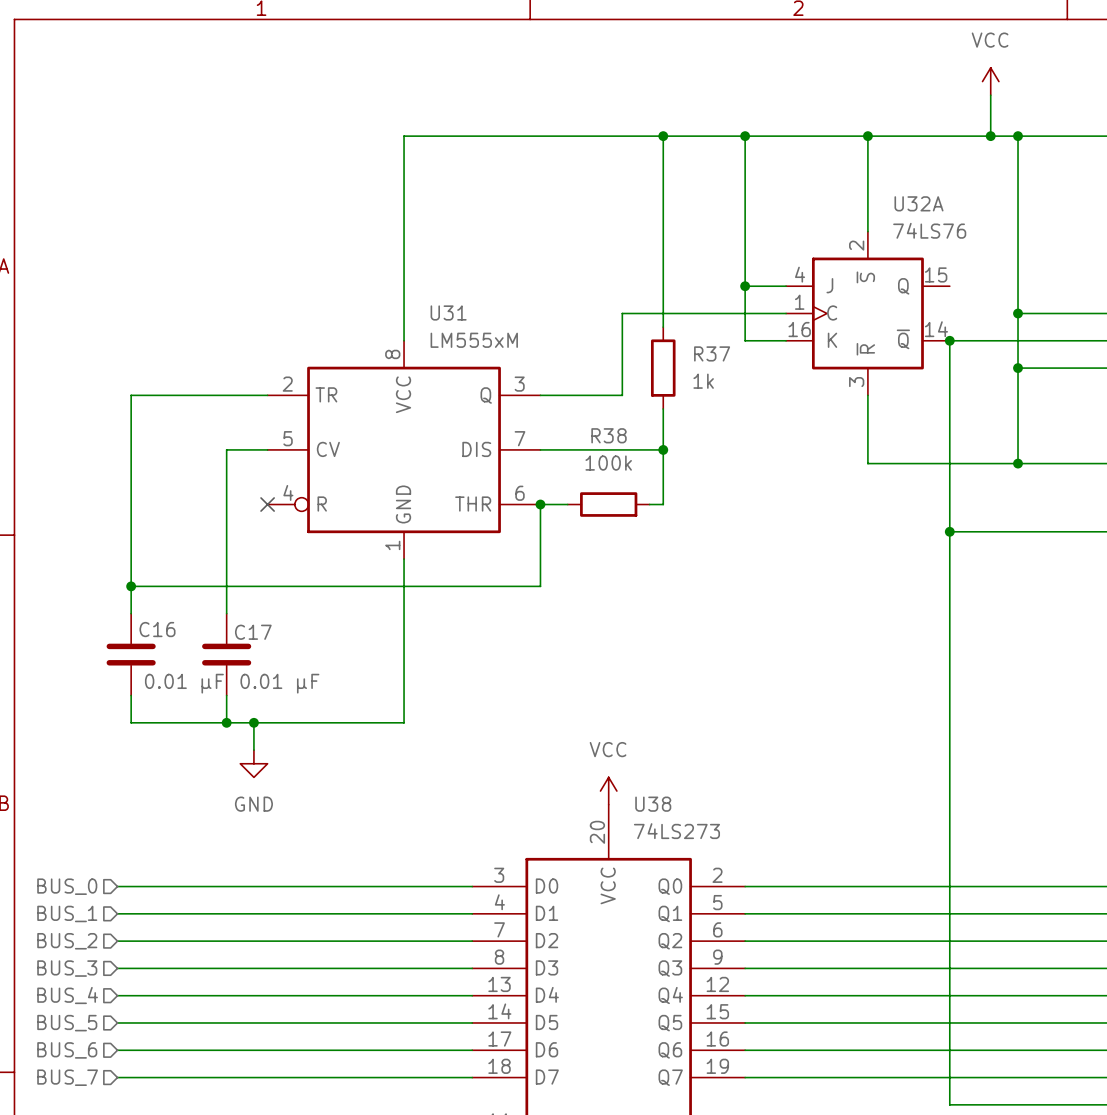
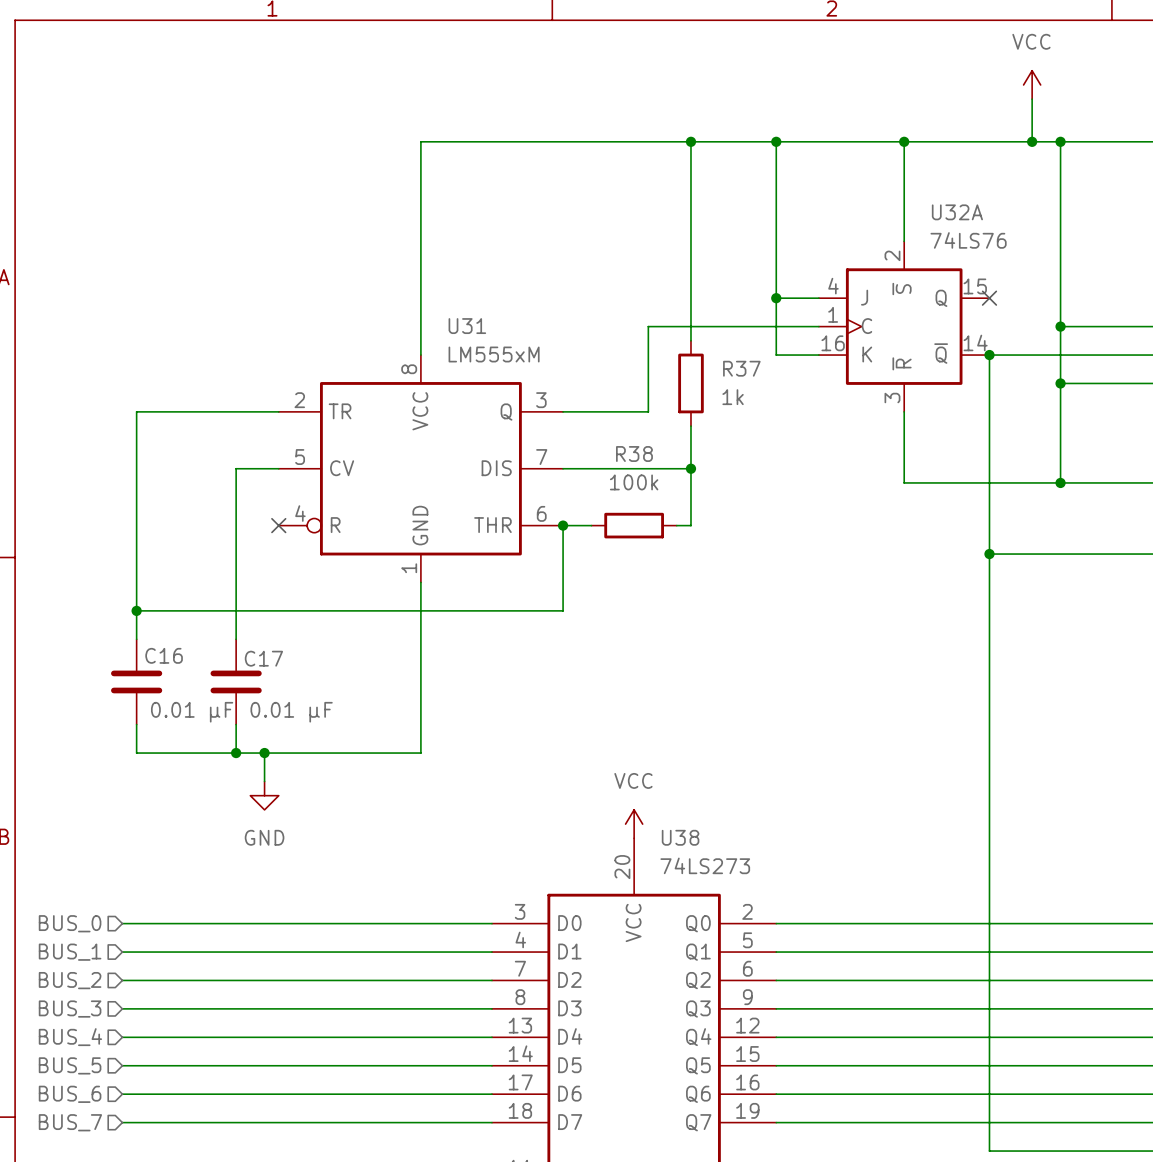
no-connect mark: none -> (989, 298)

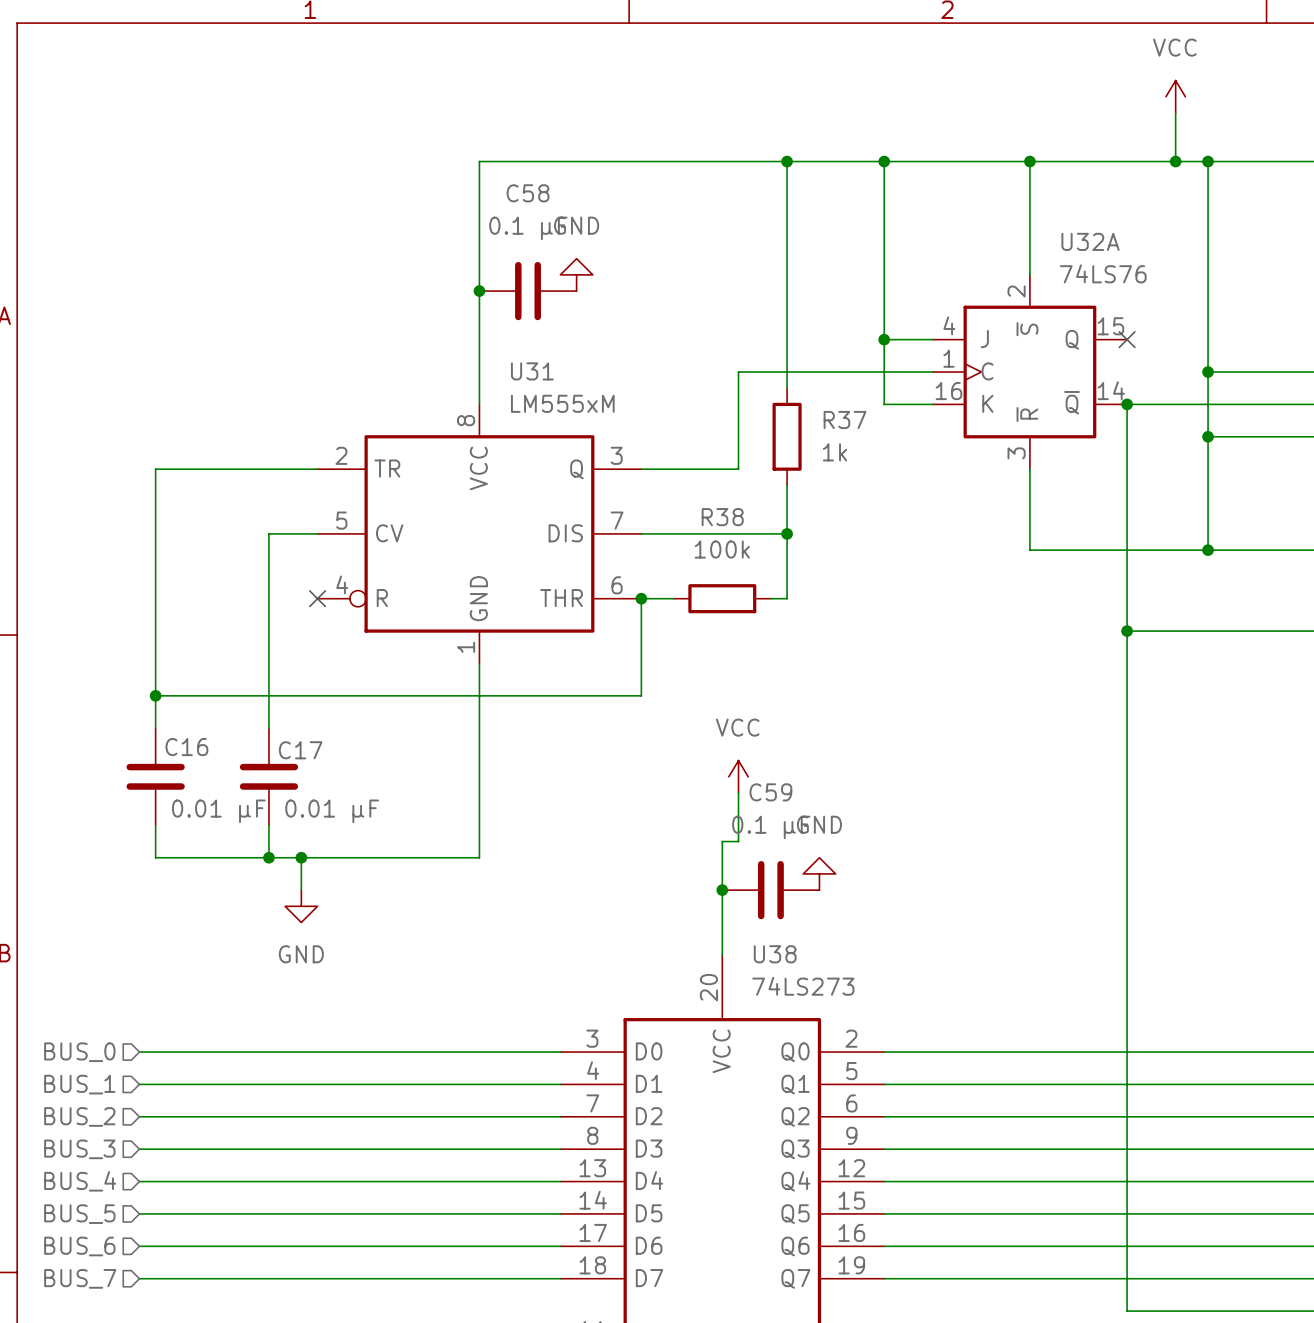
power symbol: none -> GND (576, 274)
junction: none -> (479, 291)
C58: none -> 0.1 µF (528, 291)
wire: none -> (738, 792) (738, 841) (722, 841) (722, 954)
power symbol: none -> GND (819, 873)
junction: none -> (722, 890)
C59: none -> 0.1 µF (770, 890)
power symbol position: VCC (634, 824) -> VCC (738, 776)

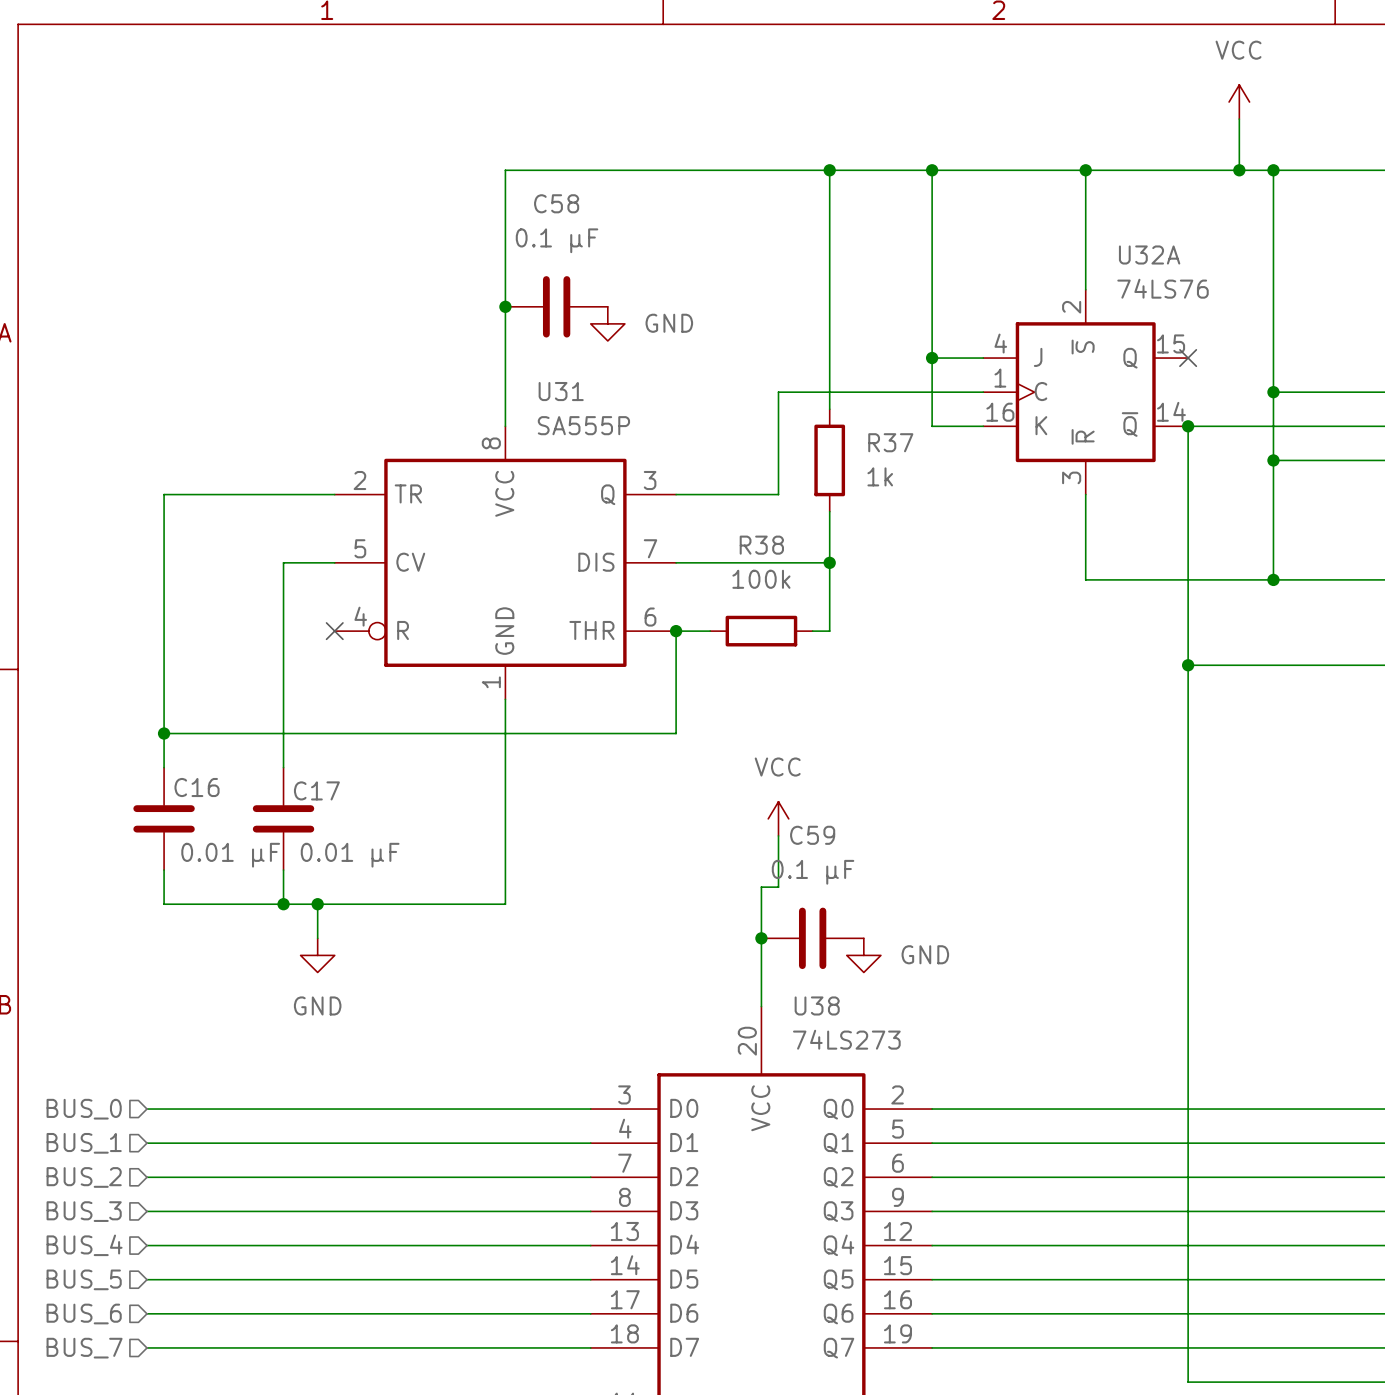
power symbol text position: GND (576, 225) -> GND (669, 323)
power symbol rotation: 0° (576, 274) -> 180° (607, 323)
power symbol position: GND (576, 274) -> GND (607, 323)
U31 value: LM555xM (562, 403) -> SA555P (583, 425)
power symbol text position: GND (819, 824) -> GND (925, 954)
power symbol rotation: 0° (819, 873) -> 180° (863, 955)
power symbol position: GND (819, 873) -> GND (863, 955)

